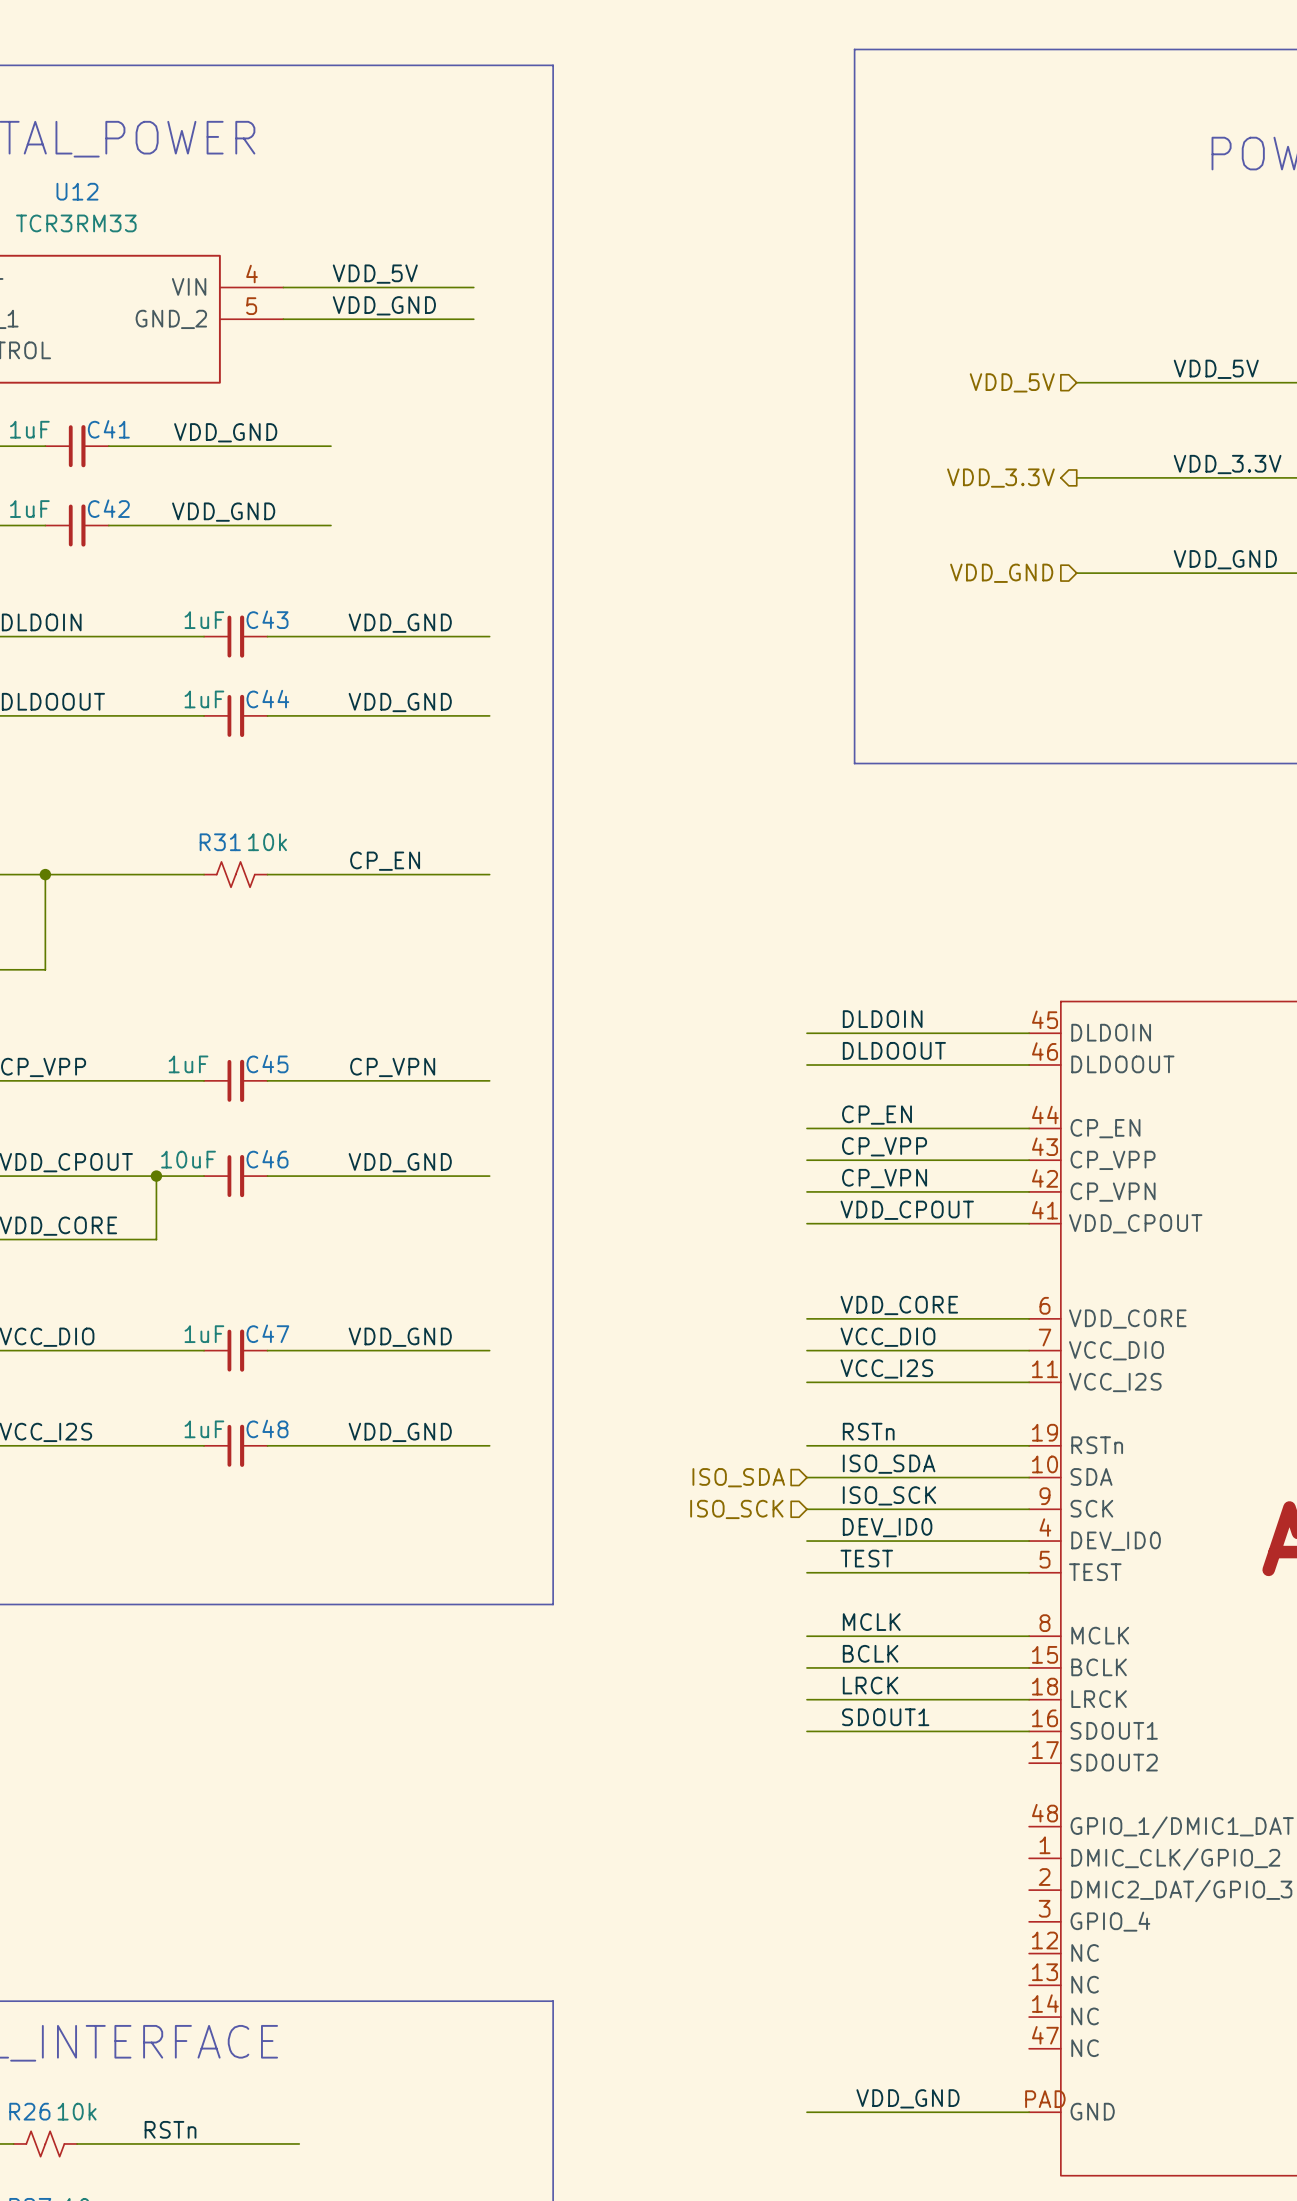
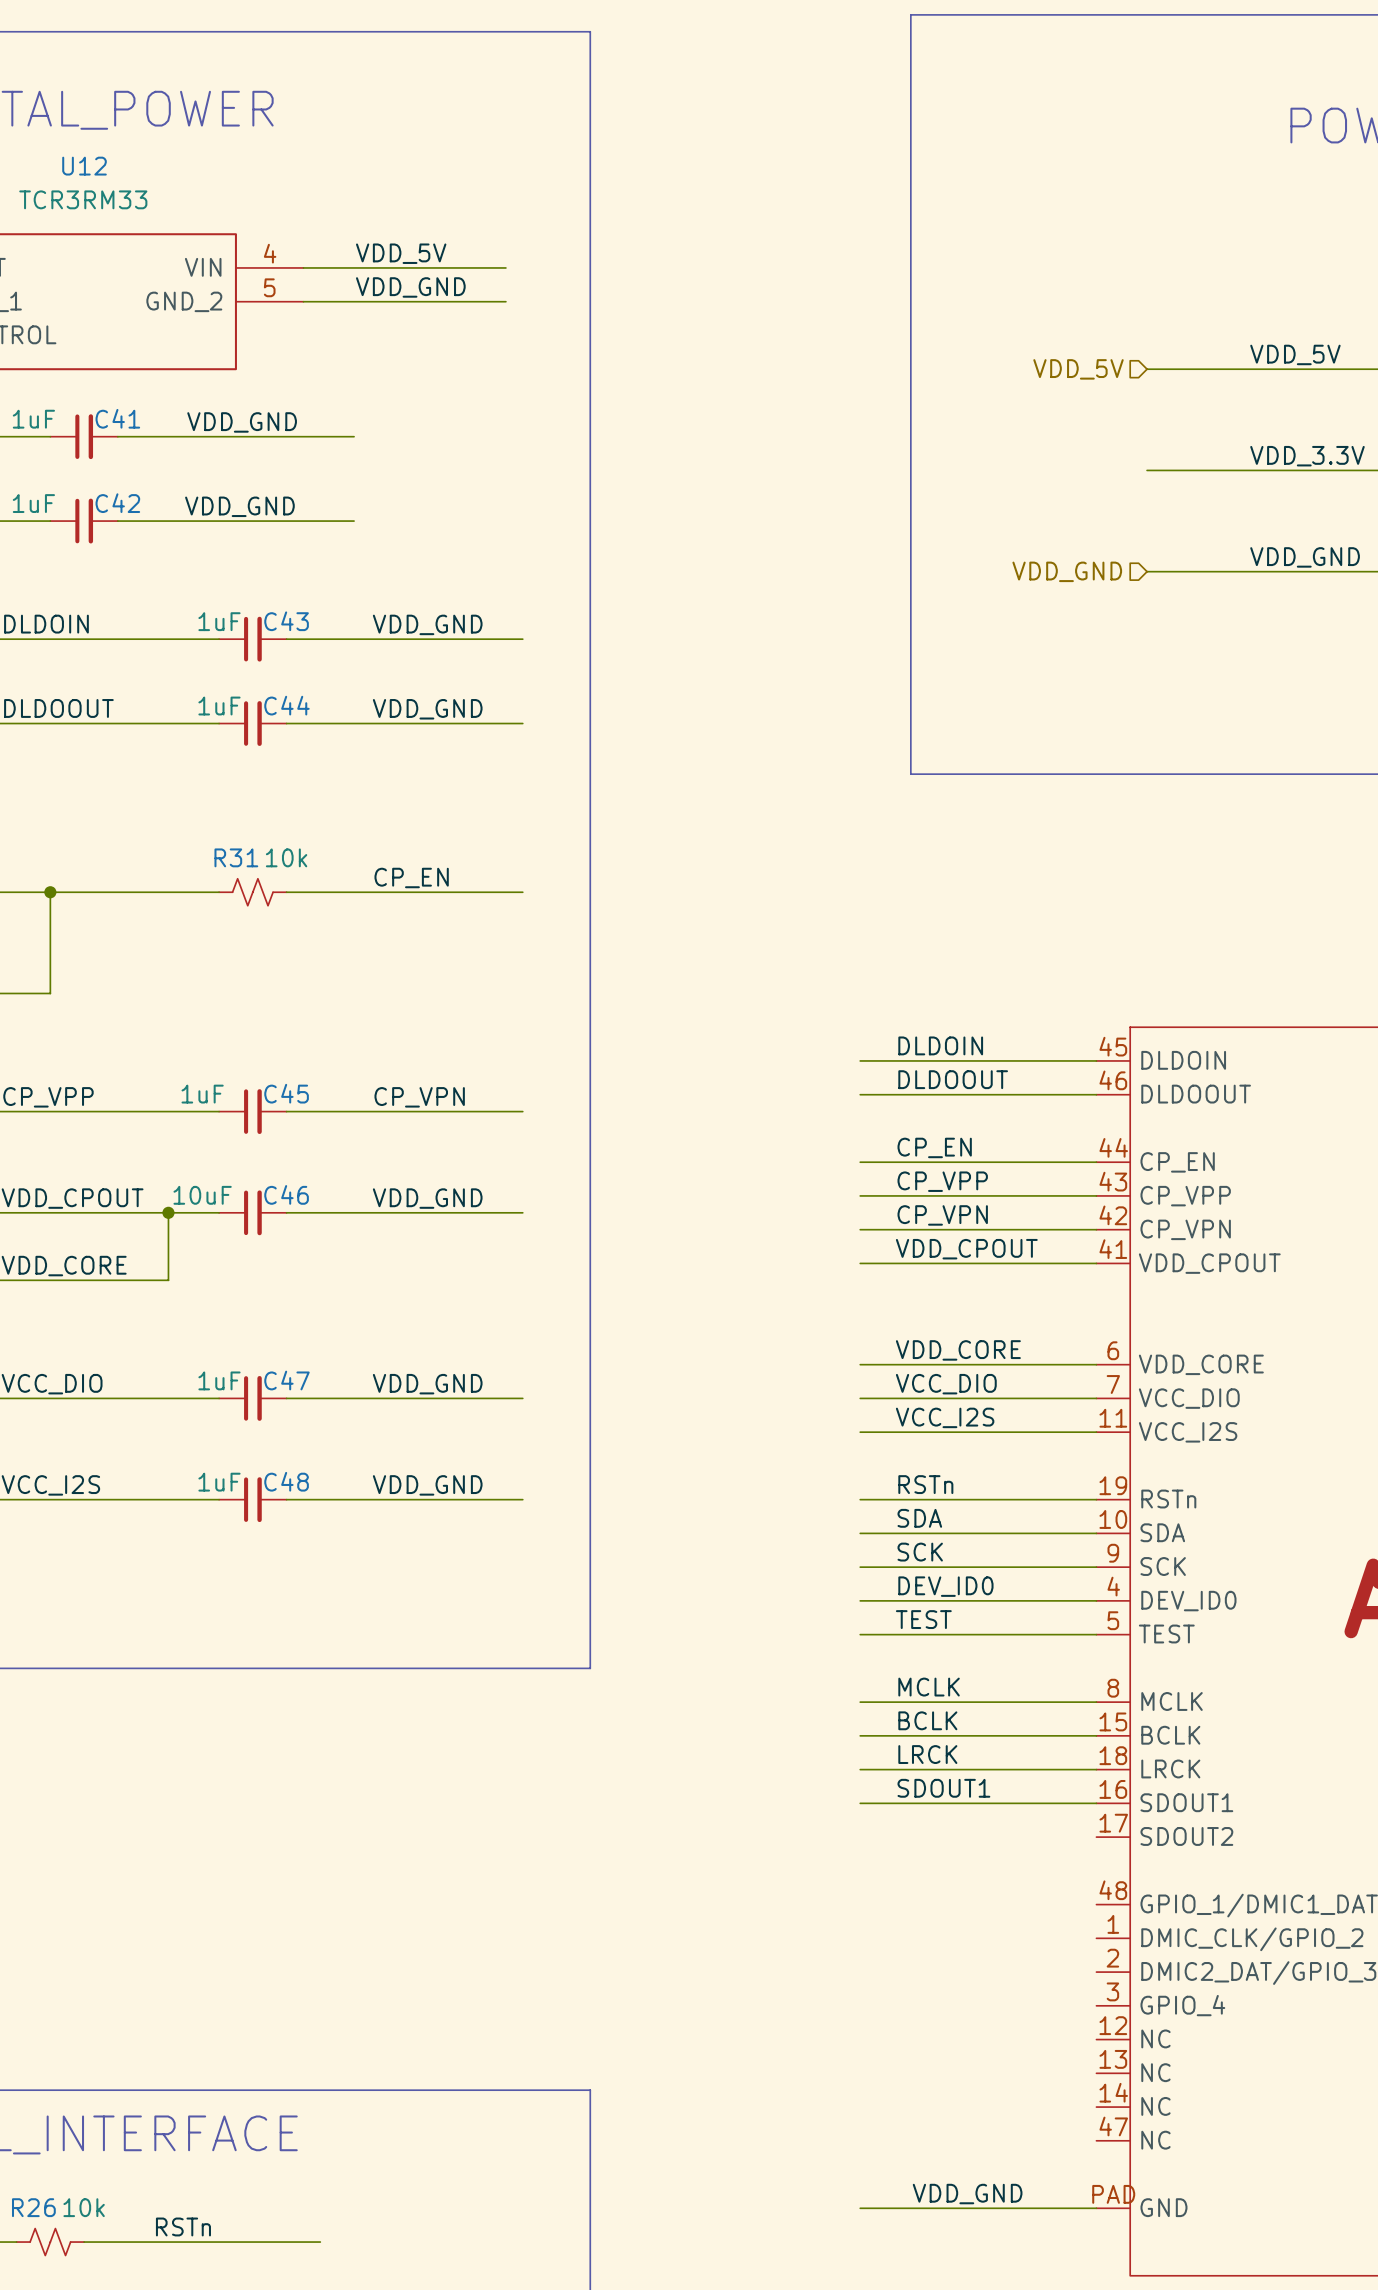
hierarchical label: VDD_3.3V (1000, 478) -> none
label: ISO_SDA (889, 1464) -> SDA (919, 1518)
hierarchical label: ISO_SDA (738, 1477) -> none
label: ISO_SCK (889, 1495) -> SCK (920, 1552)
hierarchical label: ISO_SCK (736, 1509) -> none

